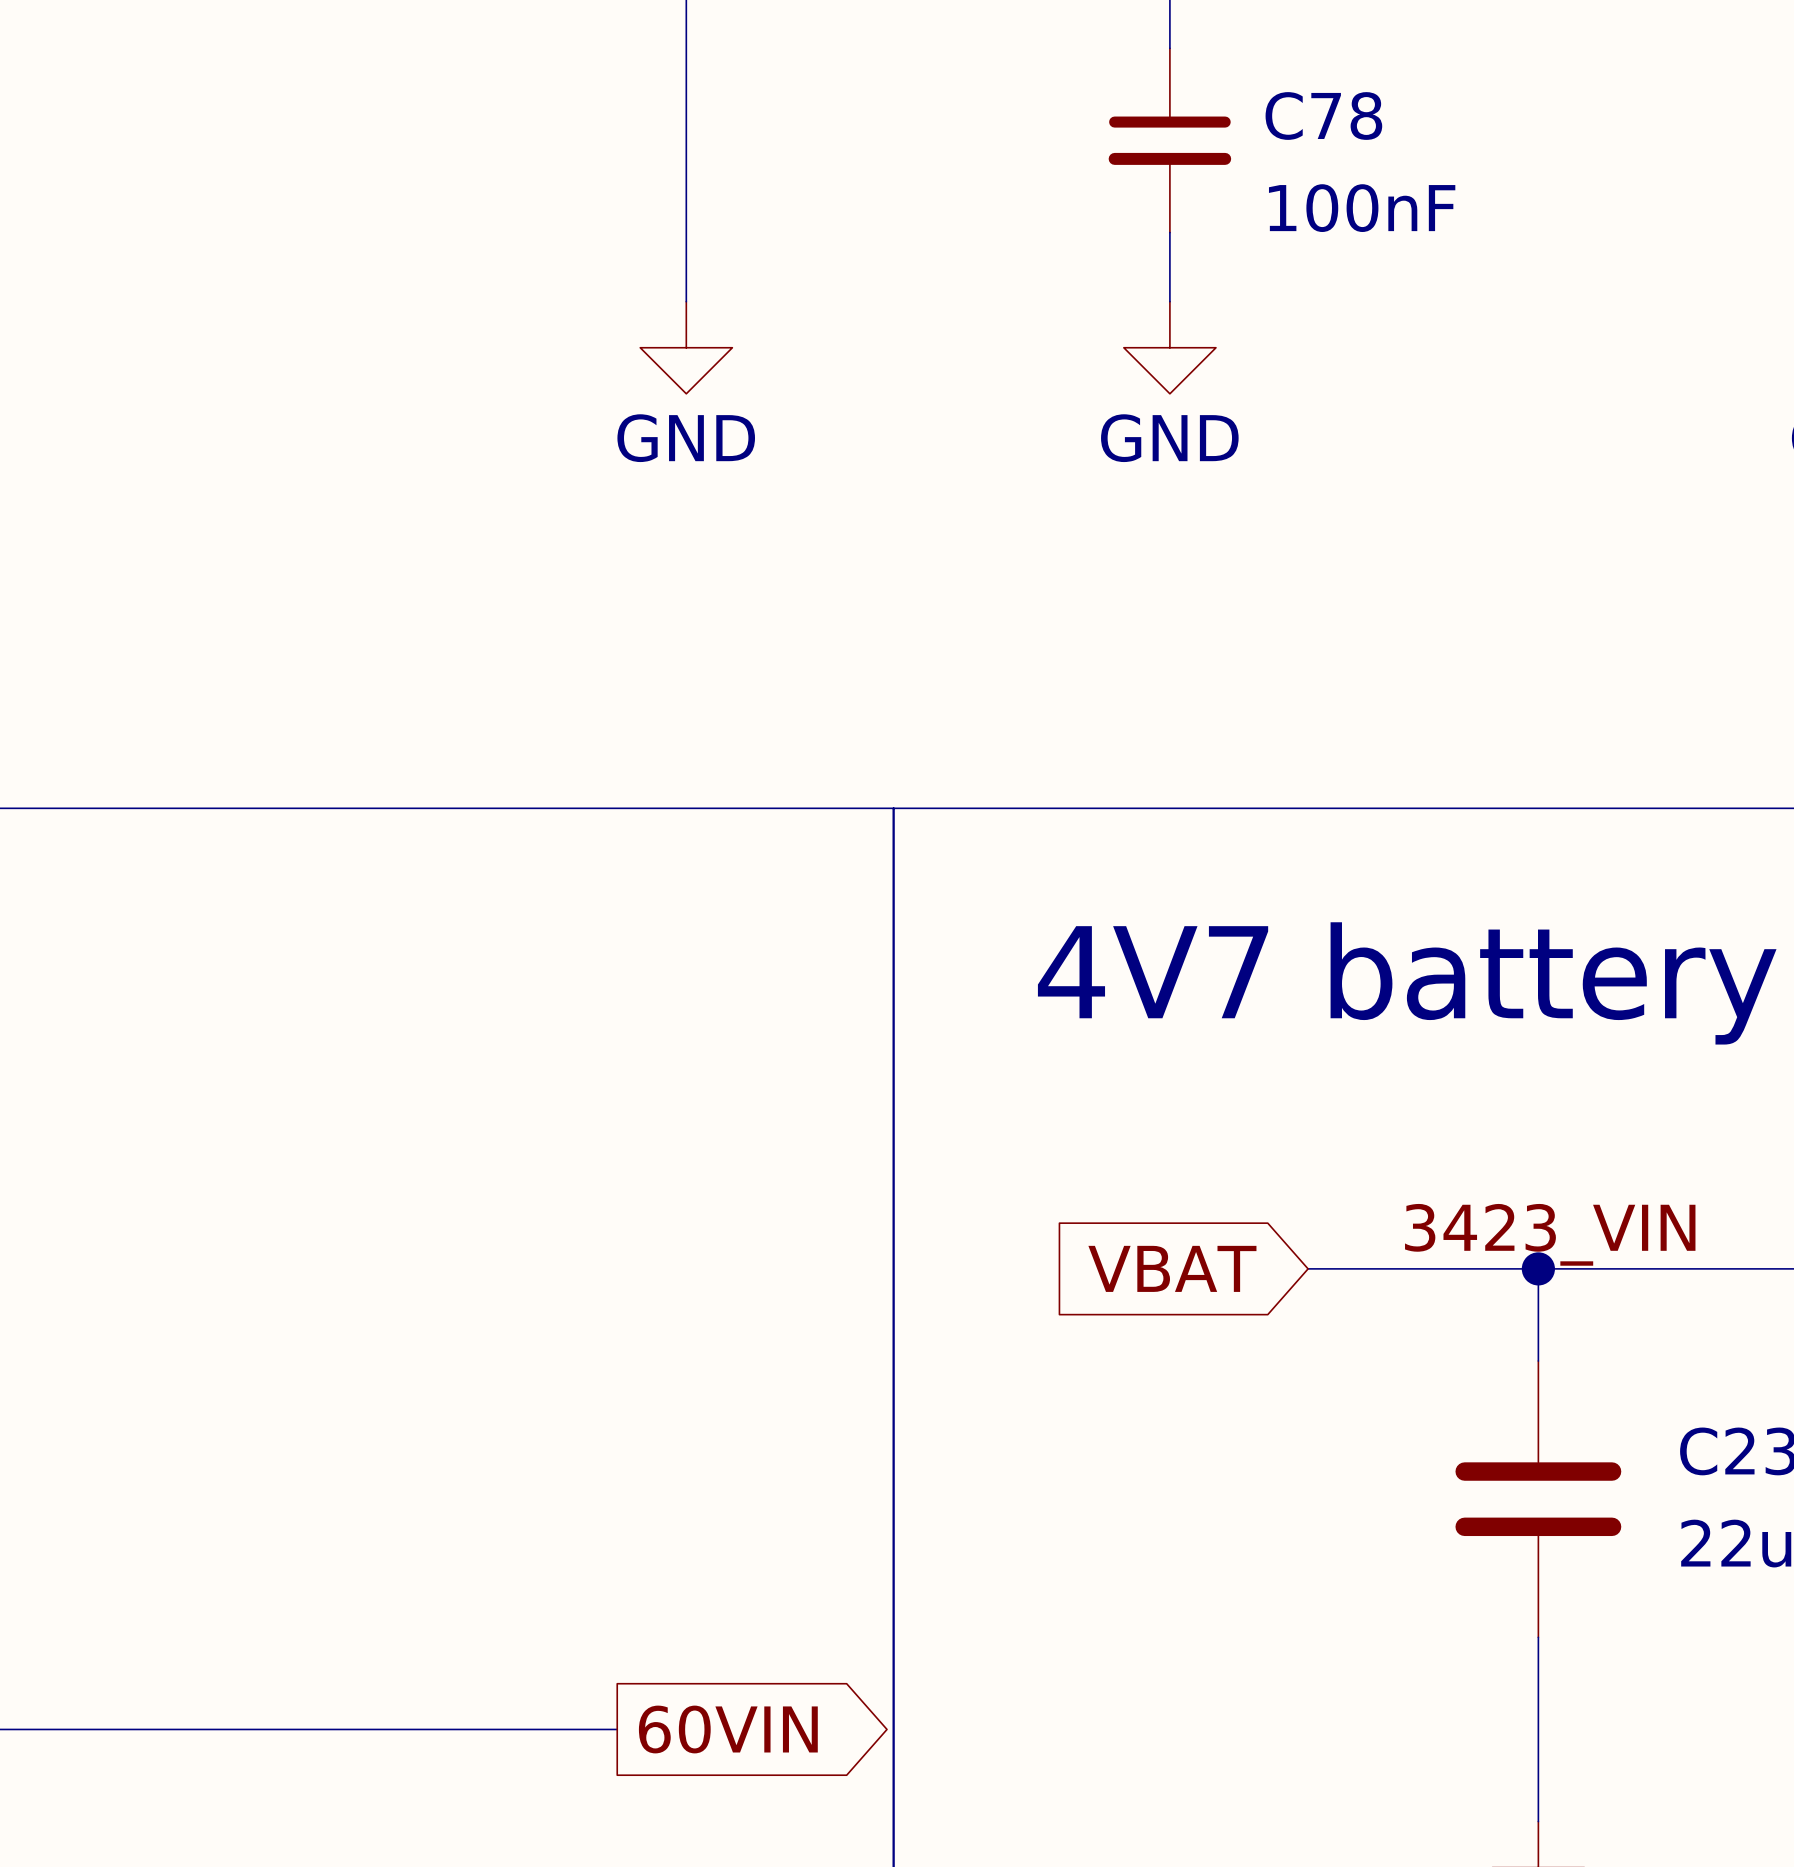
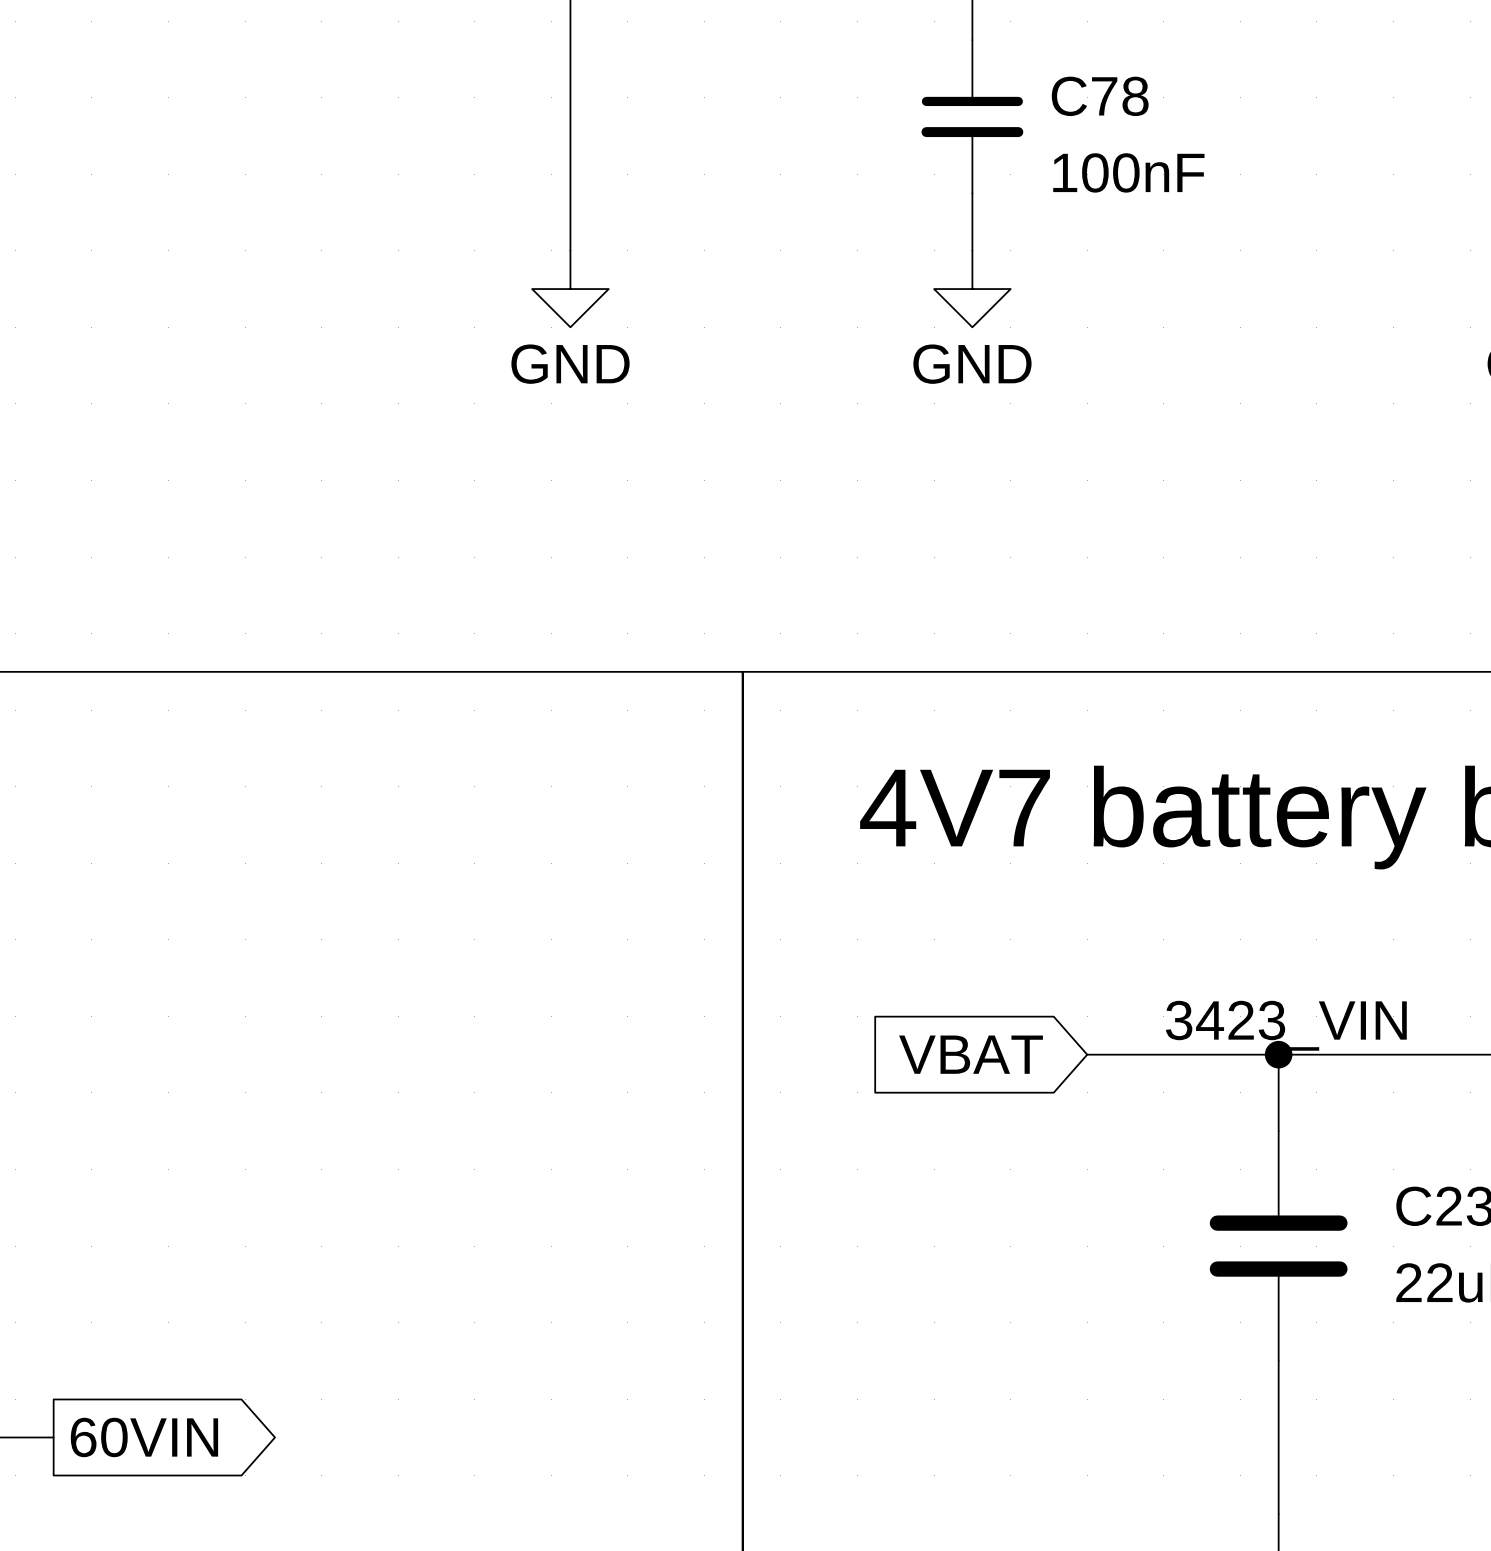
wire: (64, 1729) (617, 1729) -> none
global label position: 60VIN (728, 1729) -> 60VIN (144, 1437)

